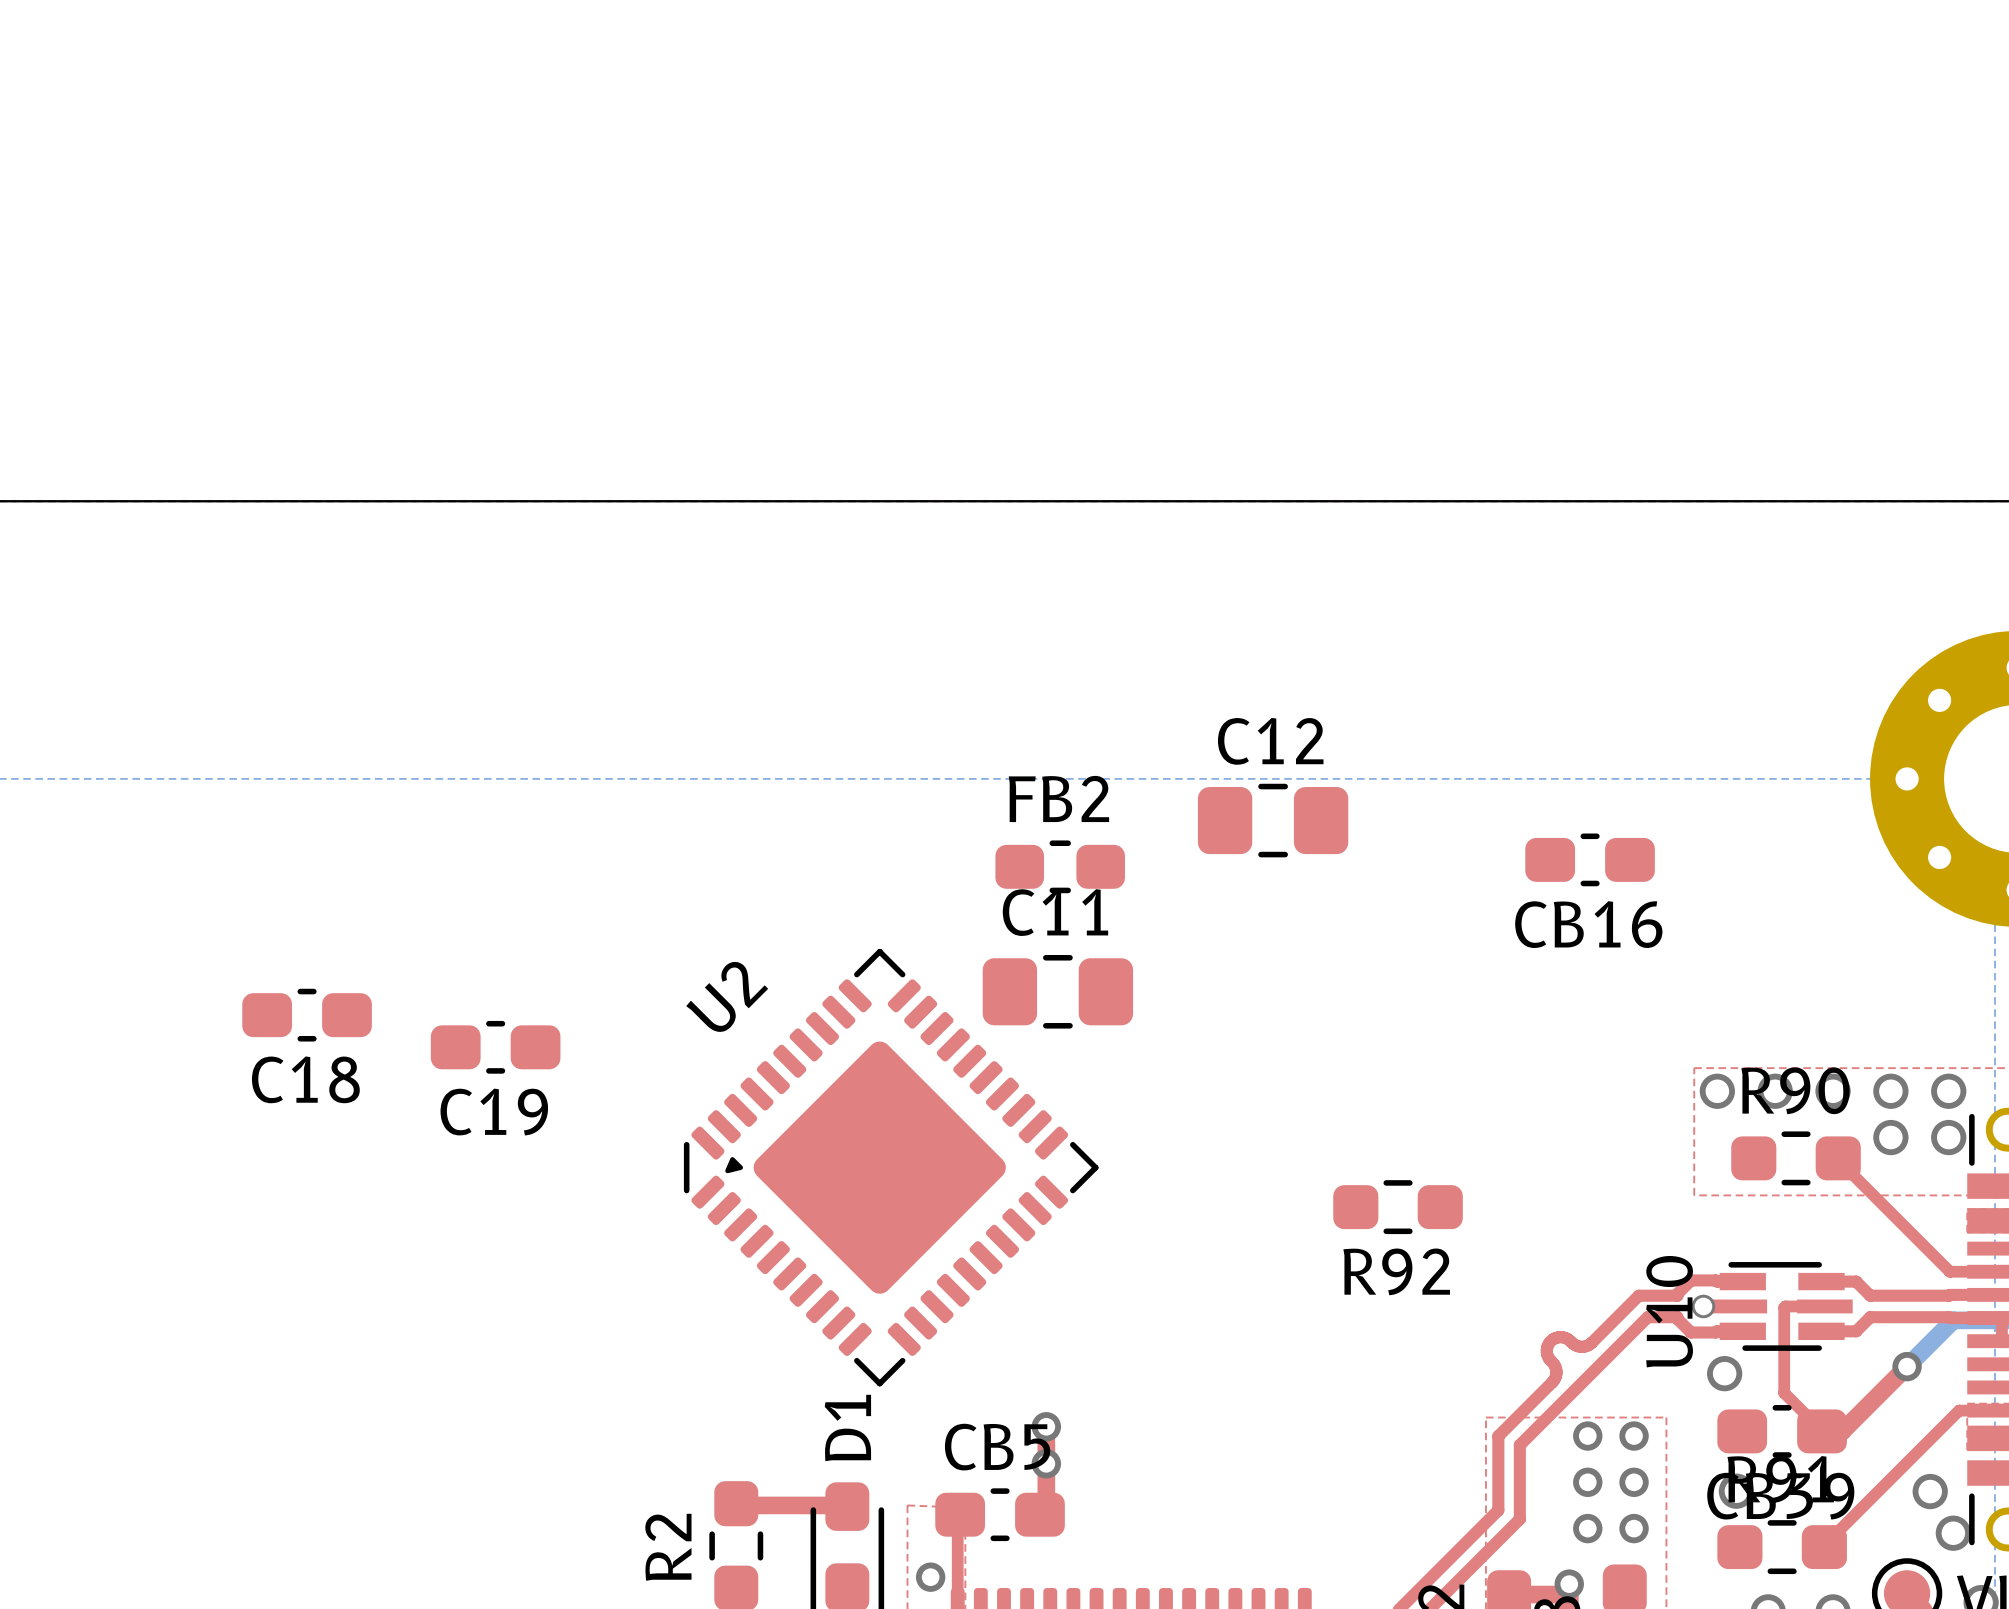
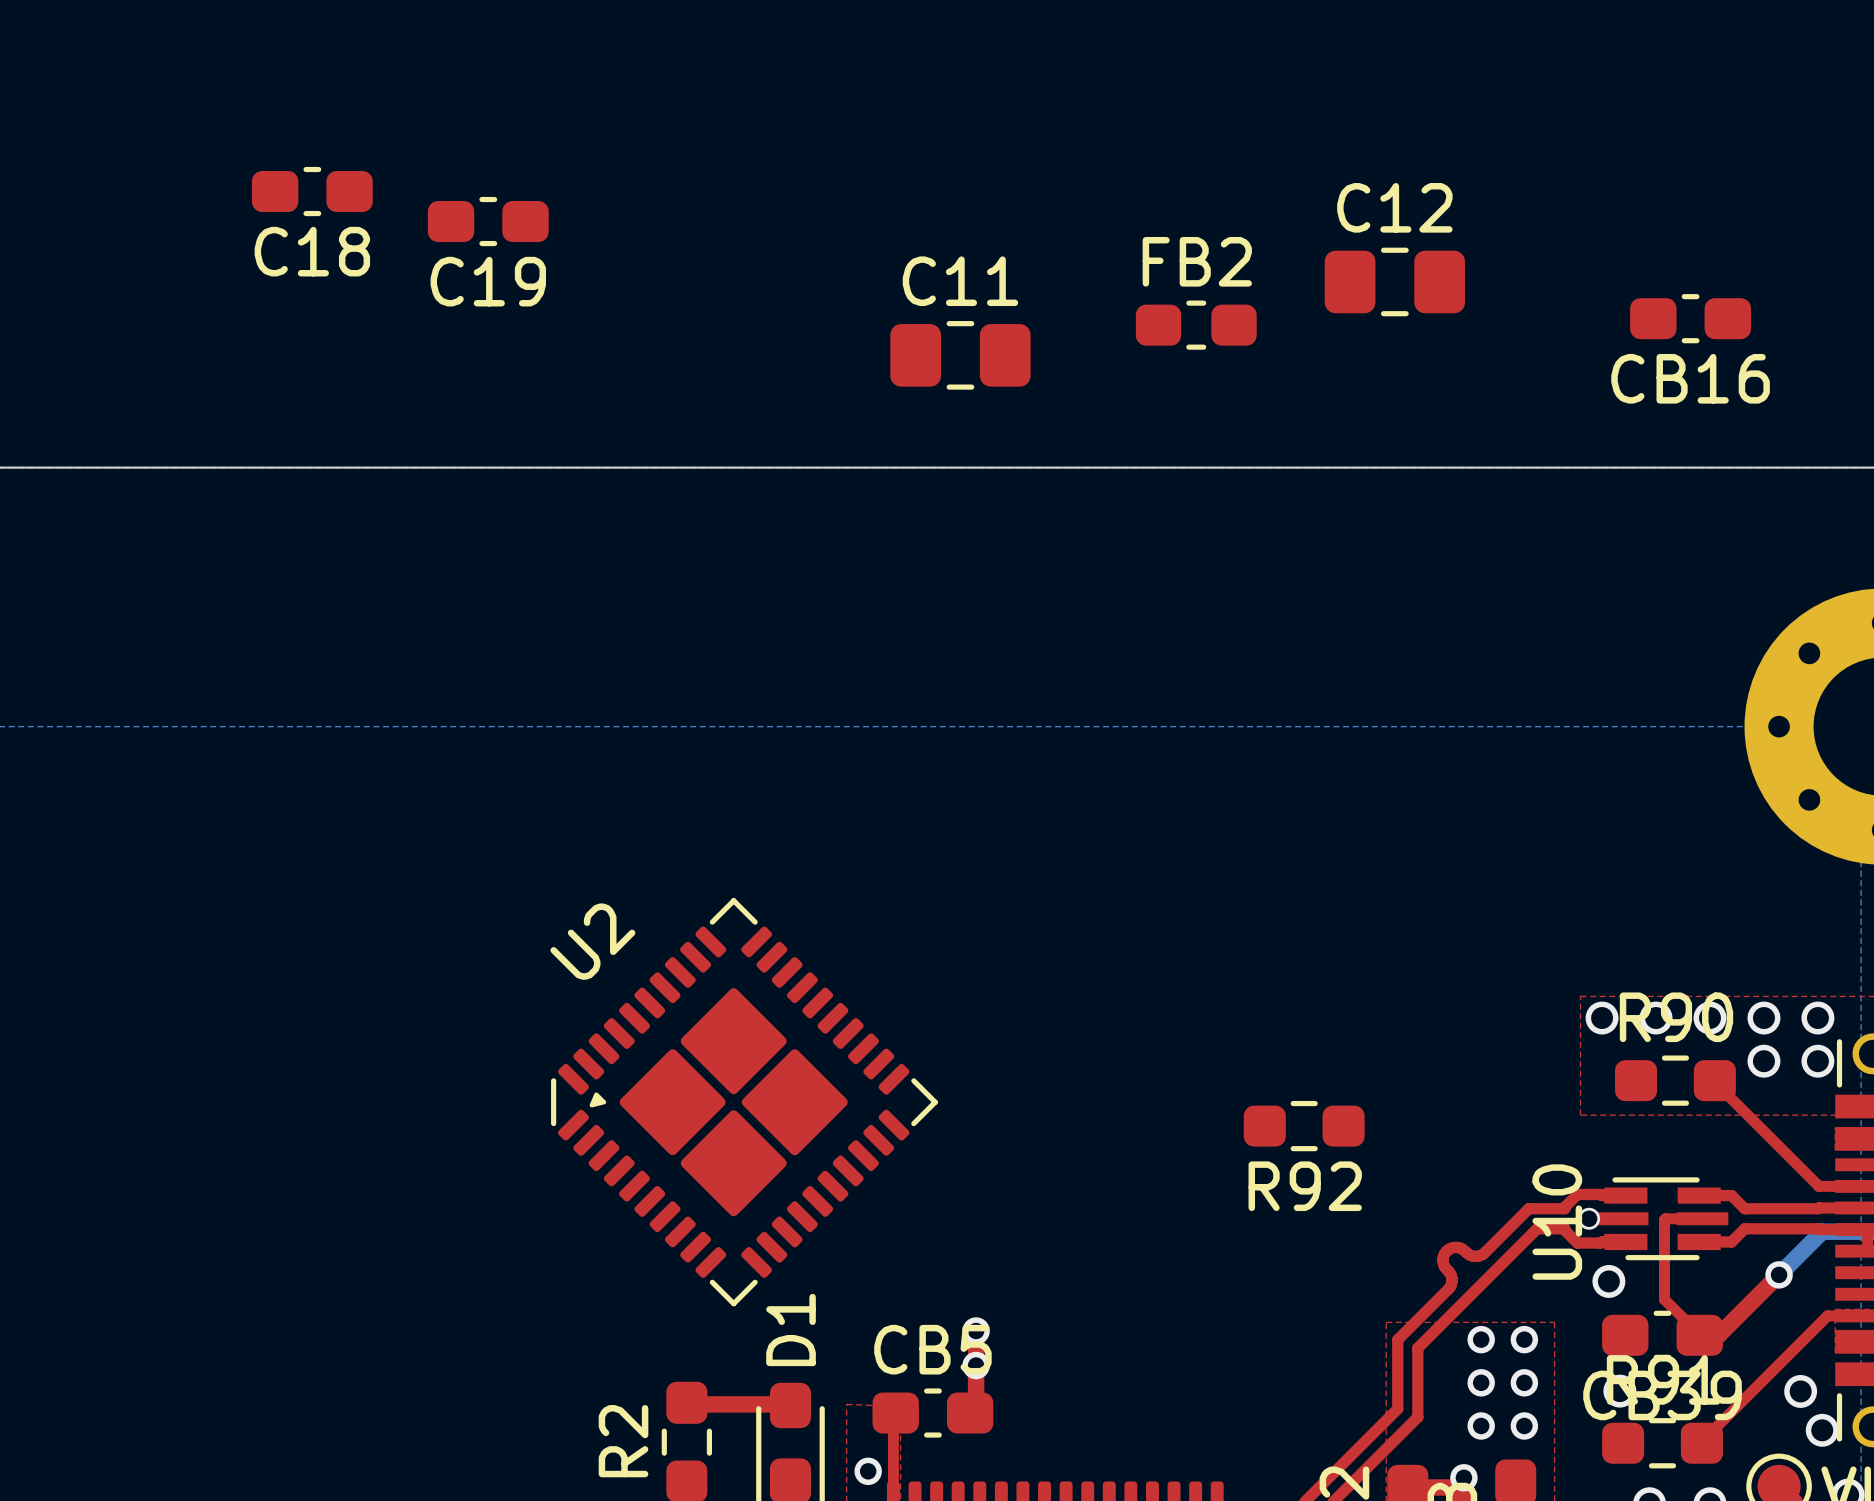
C12 position: (1273, 820) -> (1394, 281)
CB16 position: (1590, 859) -> (1690, 318)
FB2 position: (1060, 866) -> (1196, 325)
U2 footprint: [683, 948, 1099, 1387] -> [551, 898, 938, 1307]
C11 position: (1057, 991) -> (960, 355)
C18 position: (307, 1015) -> (312, 191)
C19 position: (495, 1047) -> (488, 221)

